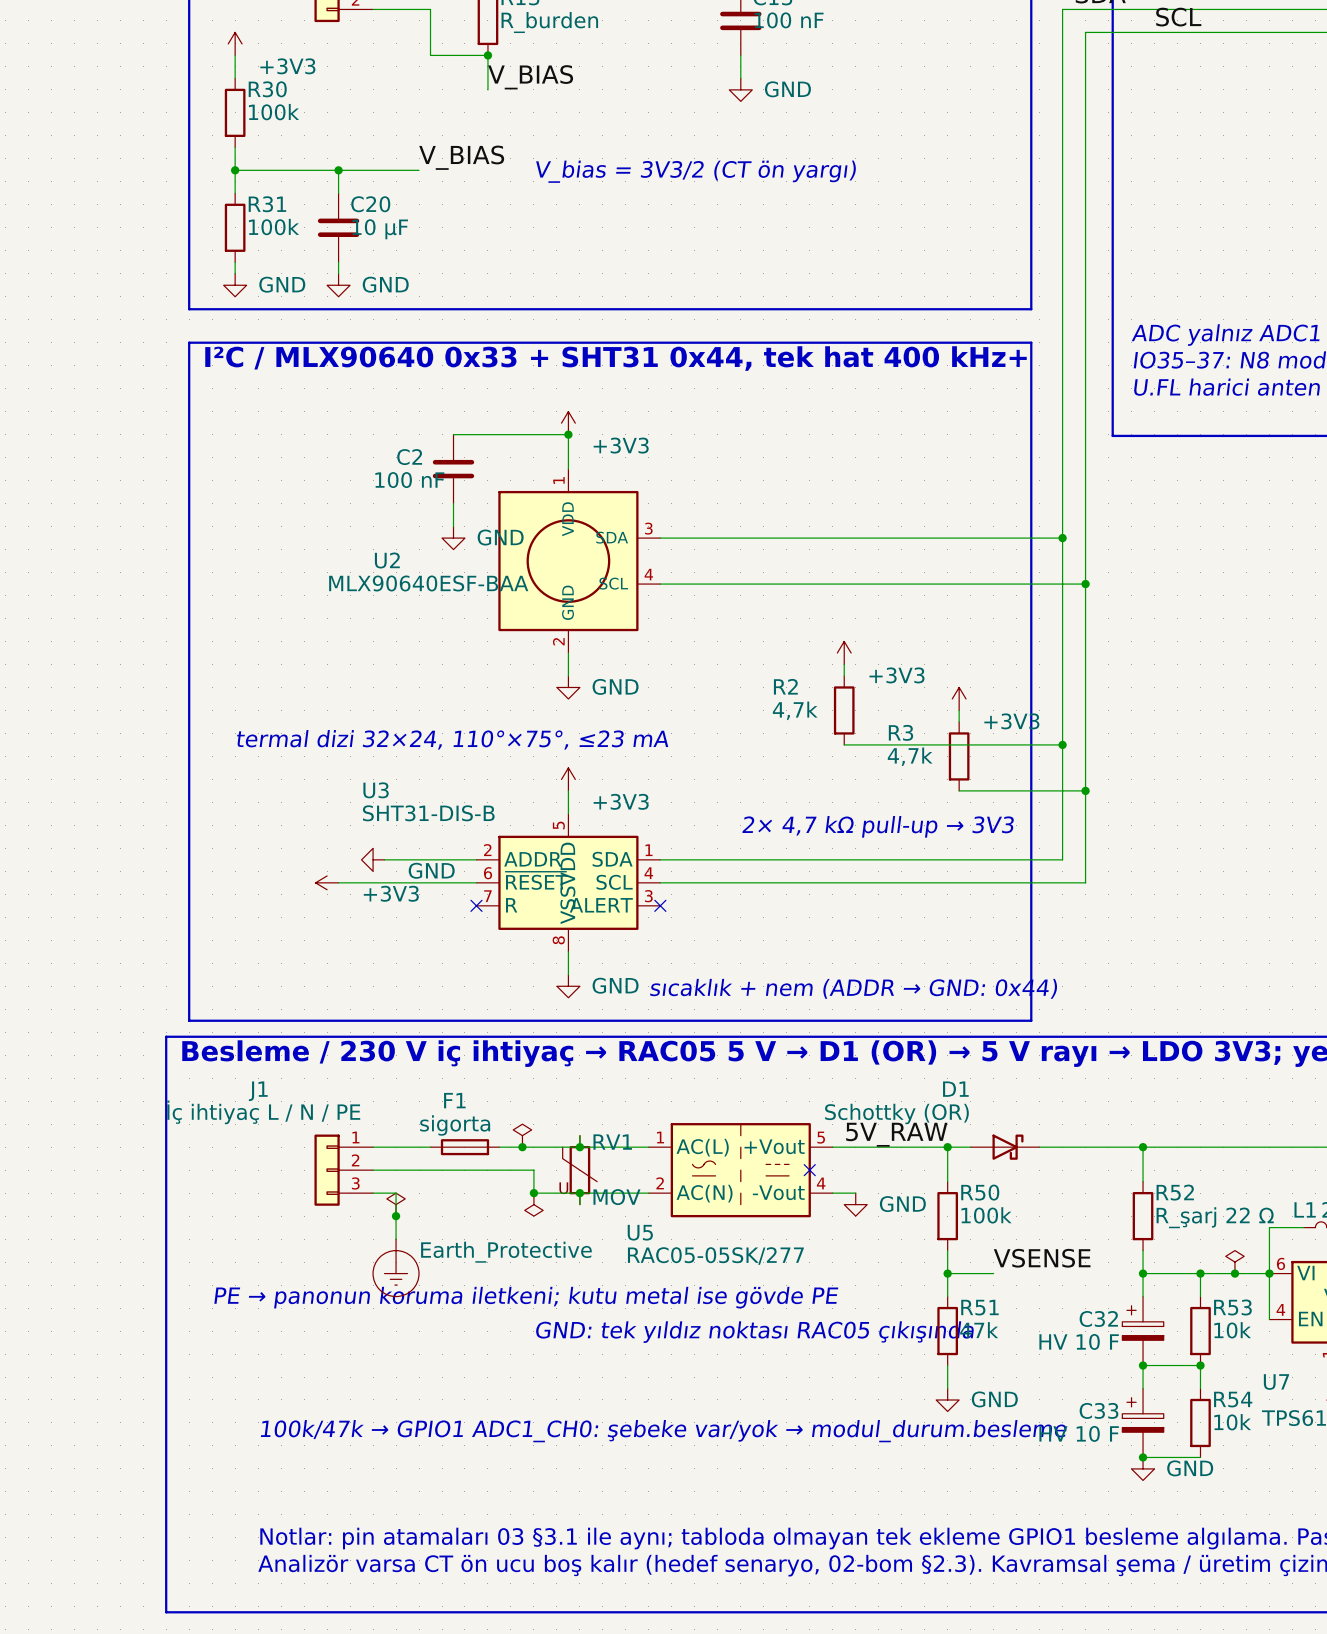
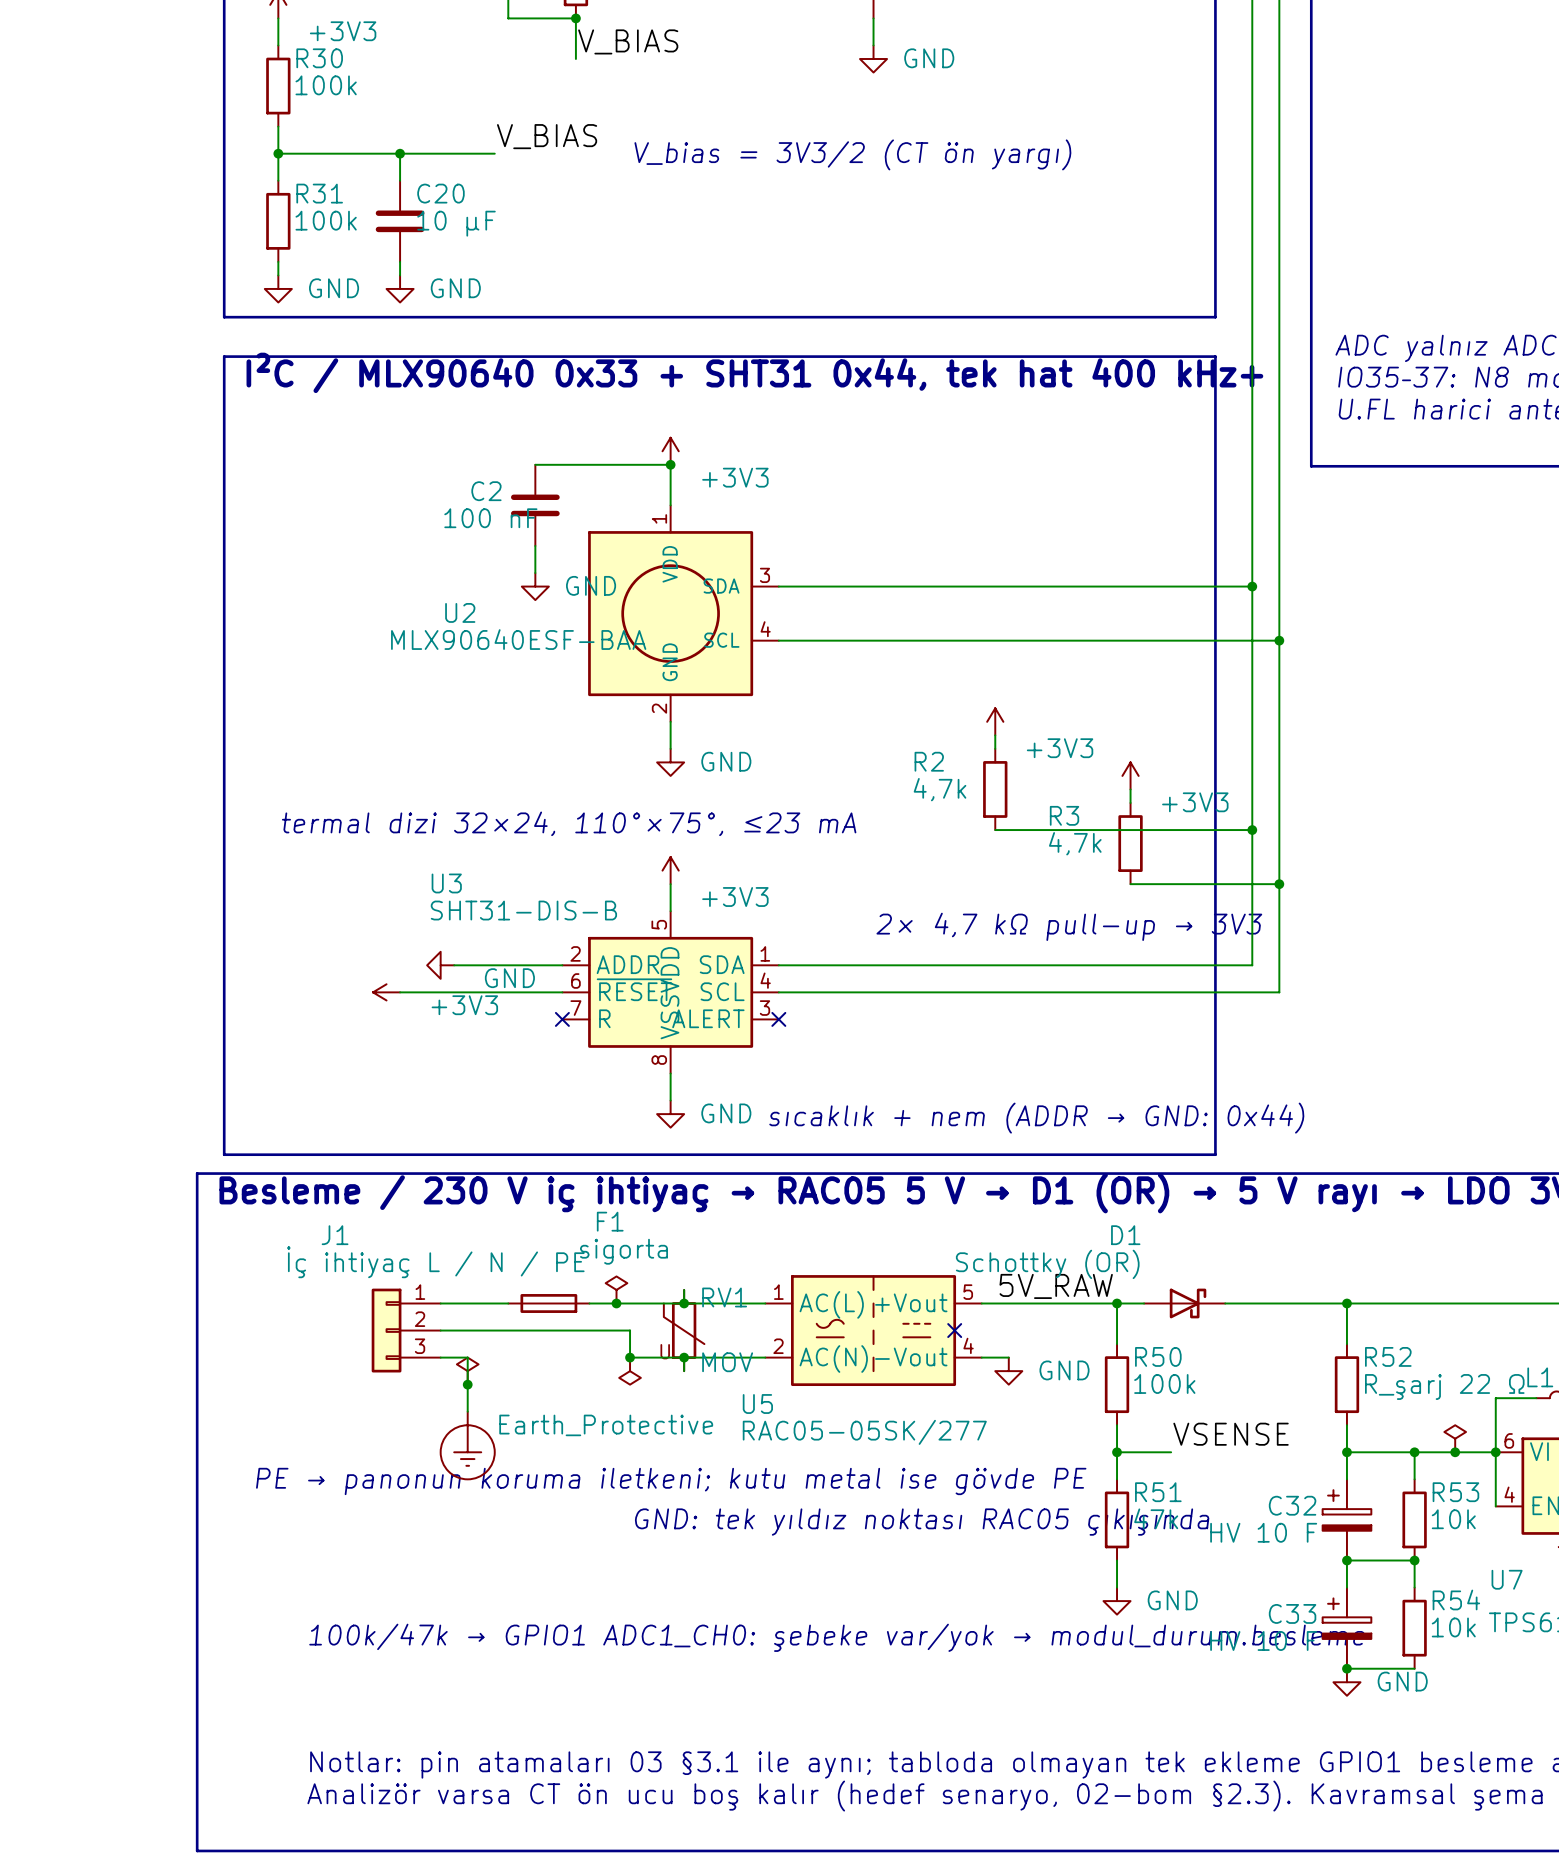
J1 name position: J1 (258, 1091) -> J1 (335, 1235)
F1 name position: F1 (454, 1100) -> F1 (610, 1221)
J1 value position: İç ihtiyaç L / N / PE (263, 1112) -> İç ihtiyaç L / N / PE (435, 1262)
F1 value position: sigorta (455, 1125) -> sigorta (623, 1251)

